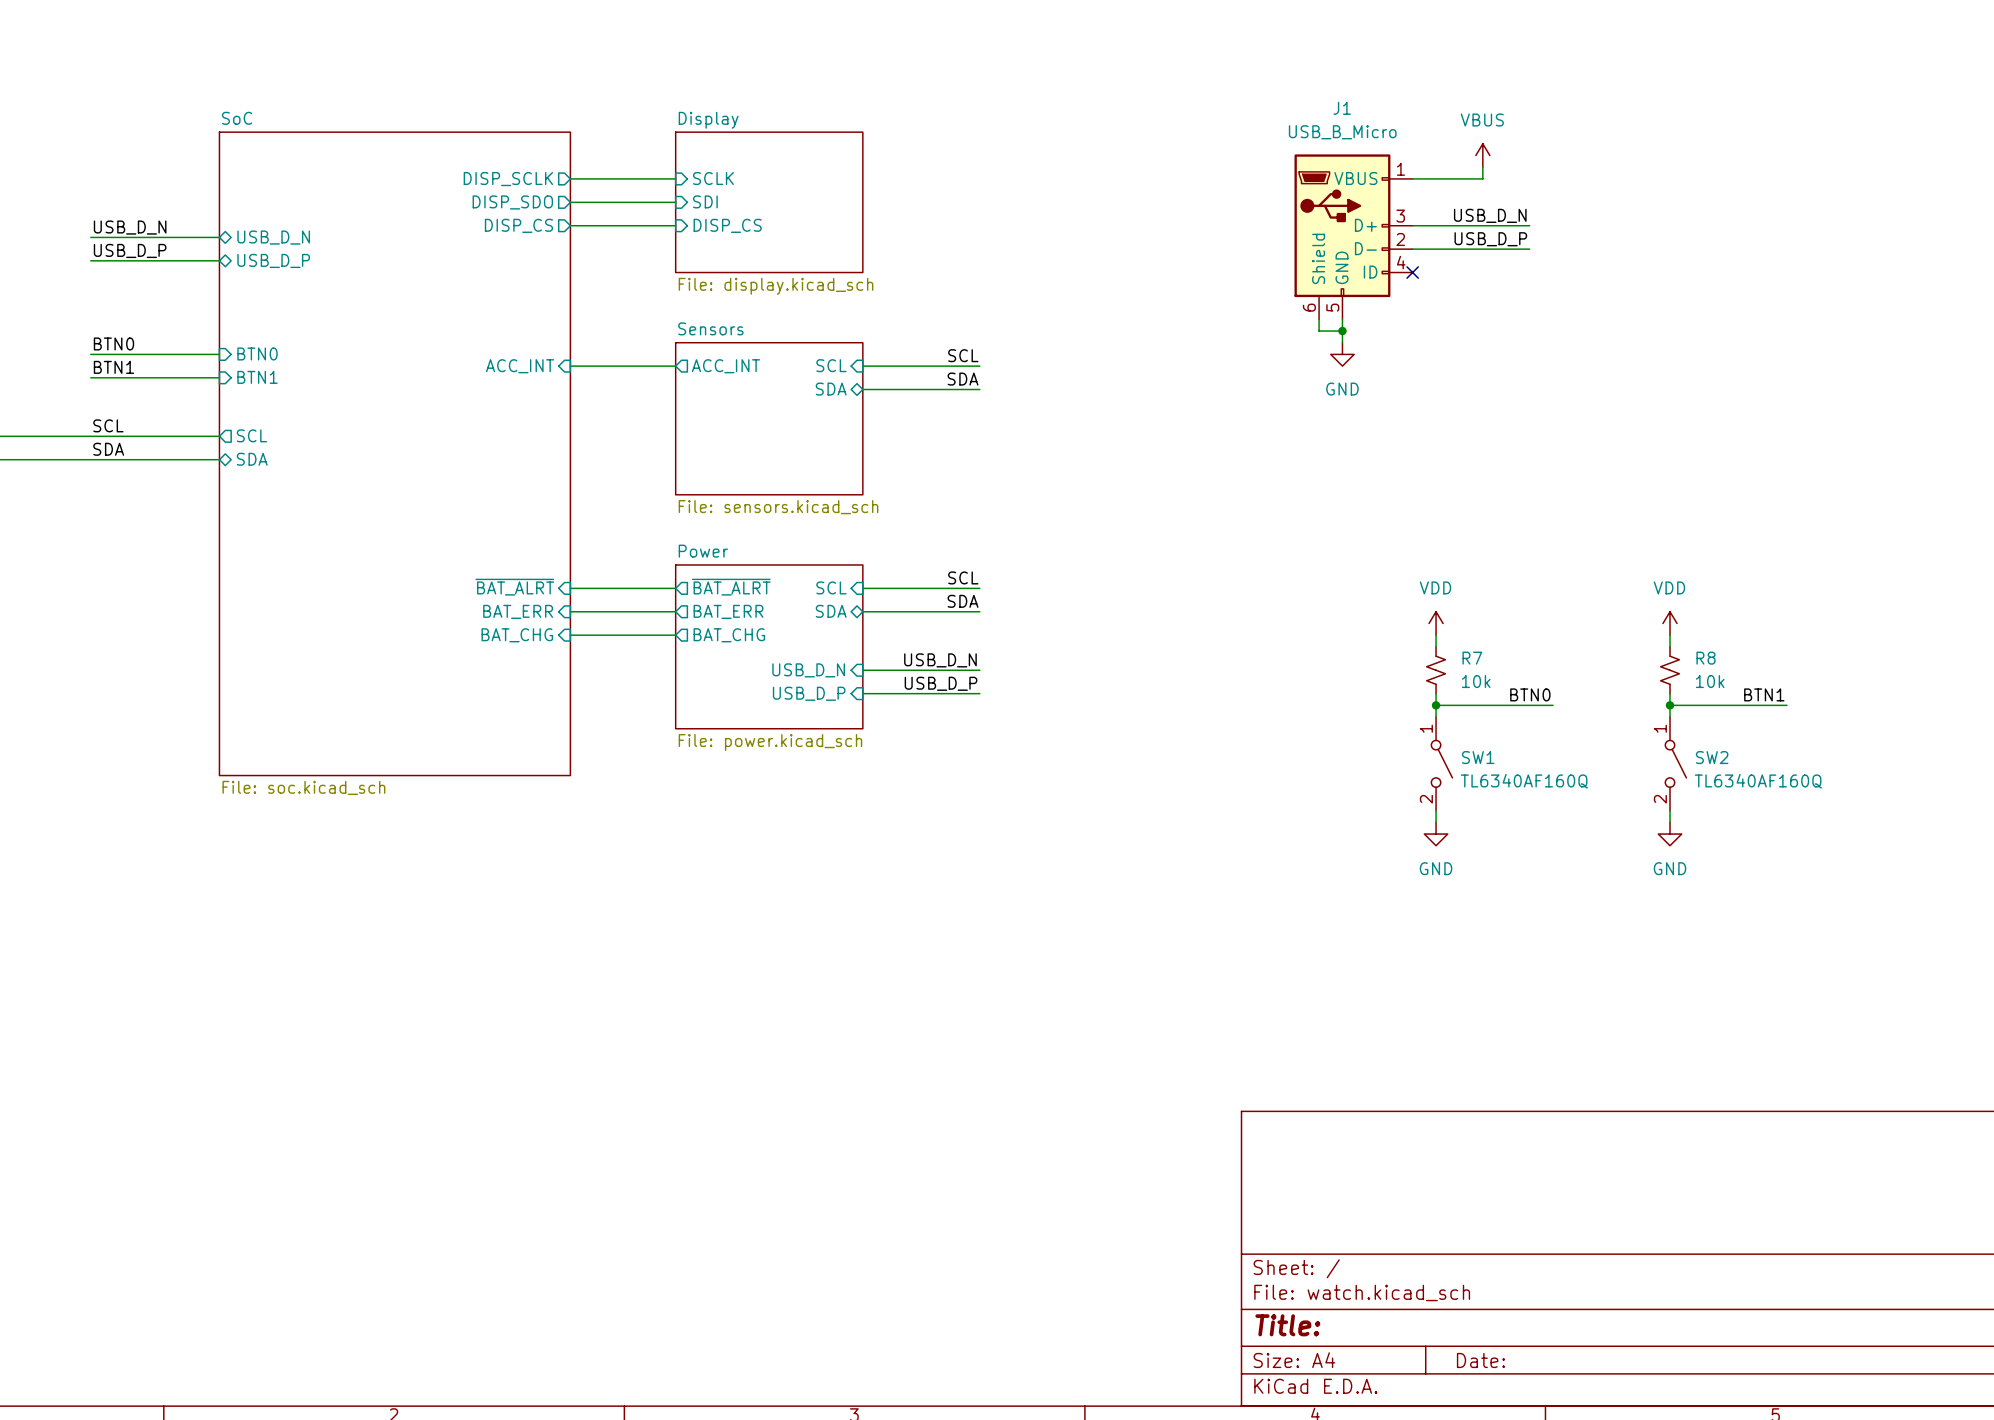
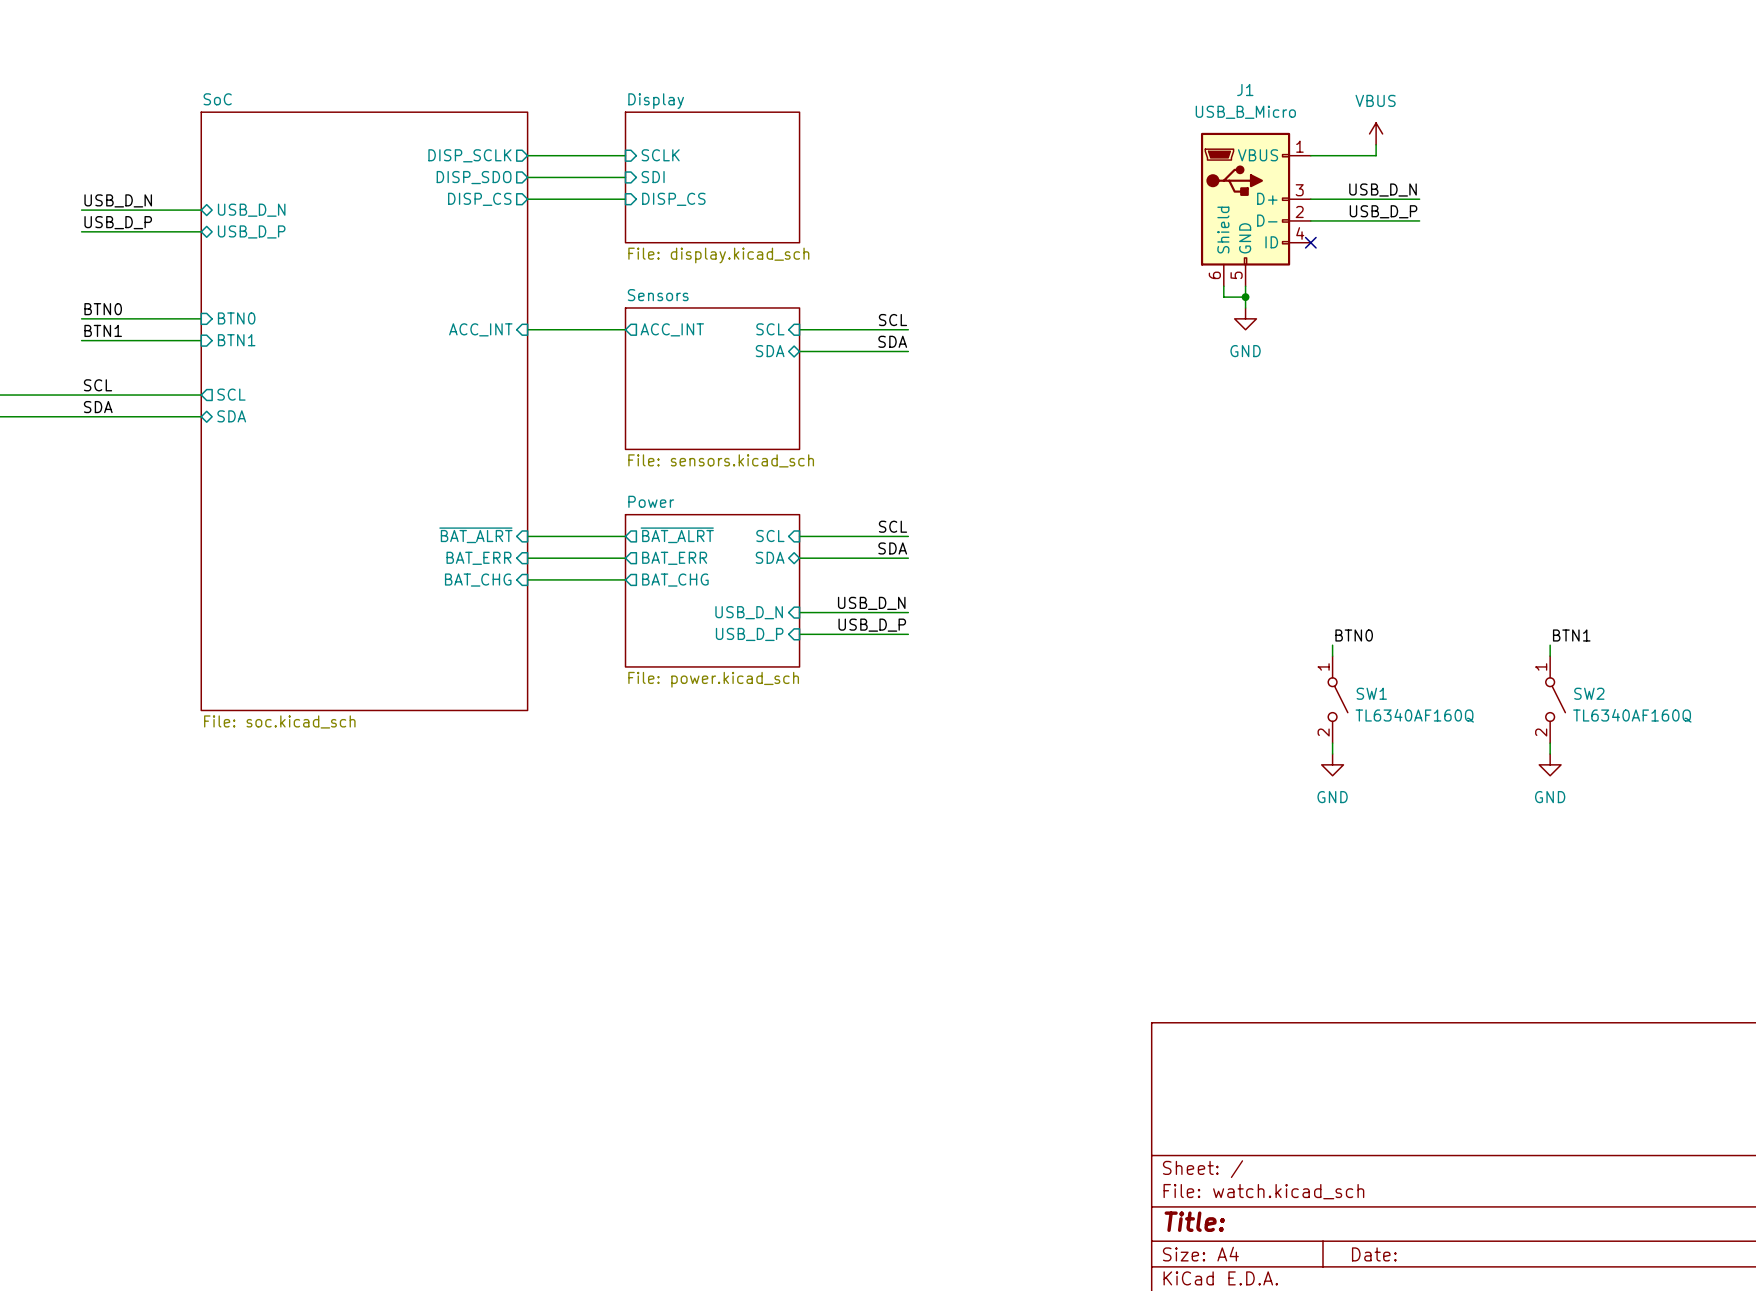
power symbol: VDD (1436, 623) -> none
power symbol: VDD (1670, 623) -> none
wire: (1436, 635) (1436, 646) -> none
wire: (1670, 635) (1670, 646) -> none
R7: 10k (1436, 670) -> none
R8: 10k (1670, 670) -> none
wire: (1436, 693) (1436, 705) (1553, 705) -> none
wire: (1670, 693) (1670, 705) (1786, 705) -> none
label position: BTN0 (1530, 694) -> BTN0 (1354, 635)
label position: BTN1 (1764, 694) -> BTN1 (1571, 635)
junction: (1436, 705) -> none
junction: (1670, 705) -> none

